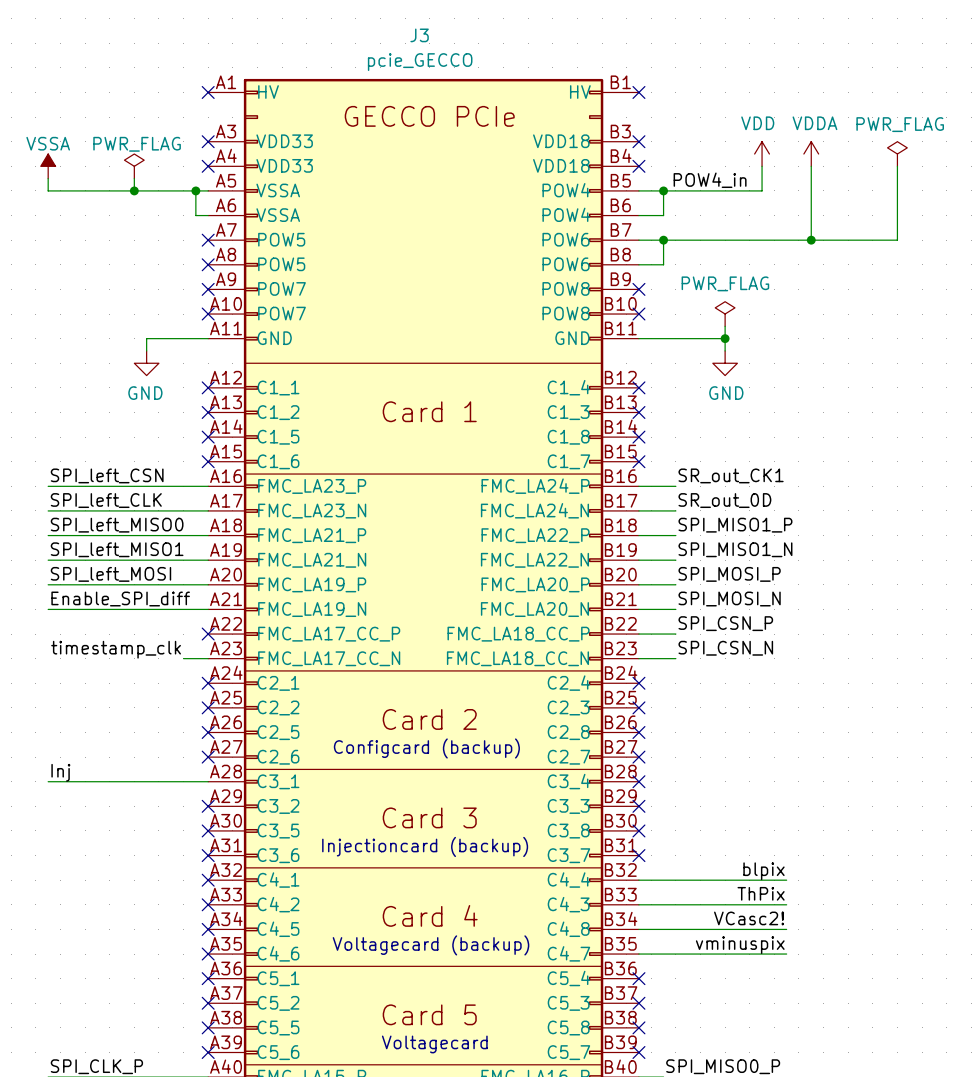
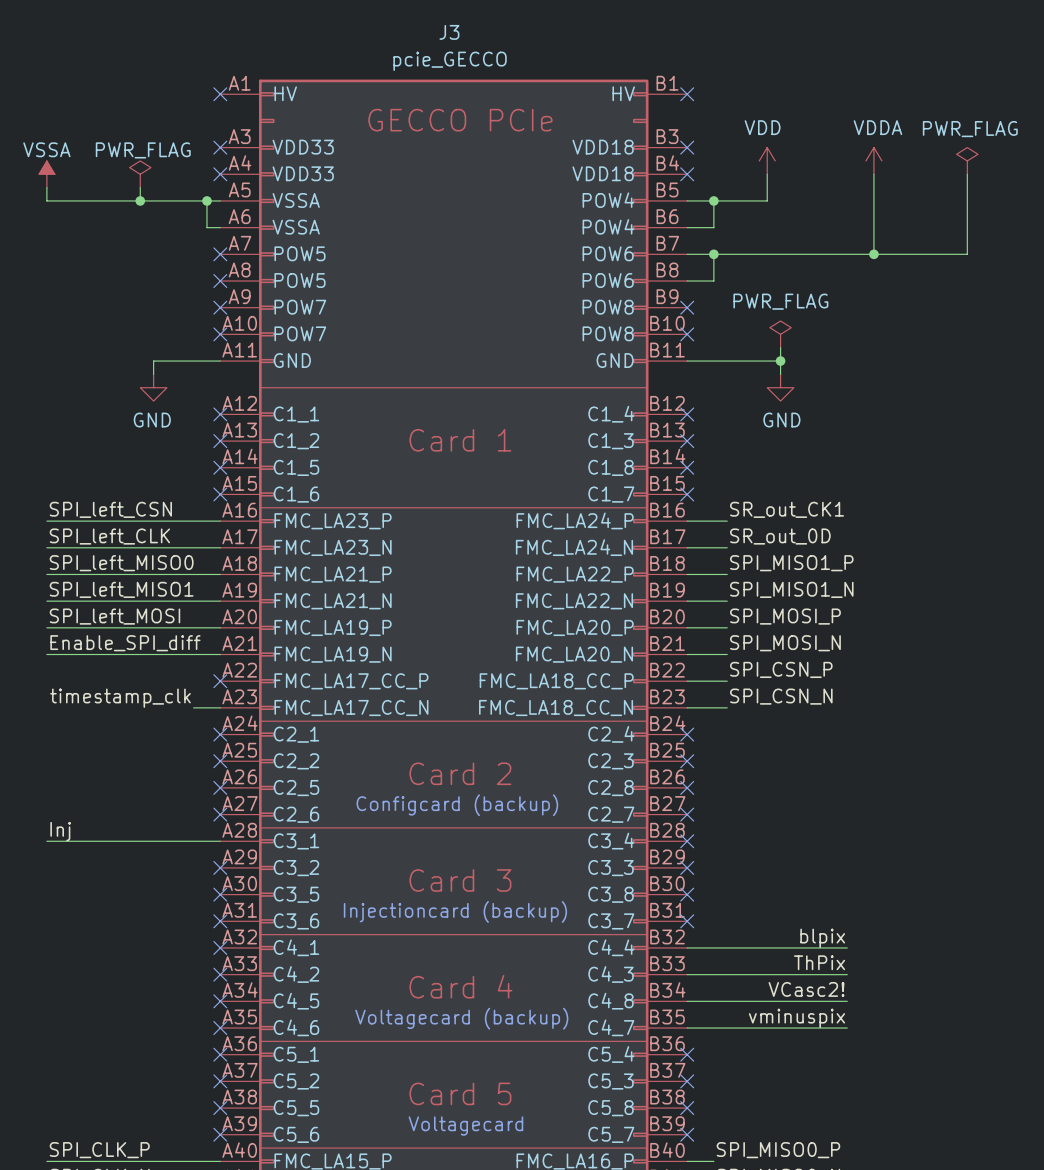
power symbol position: VDD (762, 154) -> VDD (767, 160)
wire: (762, 166) (762, 190) (712, 190) -> (767, 174) (767, 200)
label: POW4_in (710, 180) -> none

